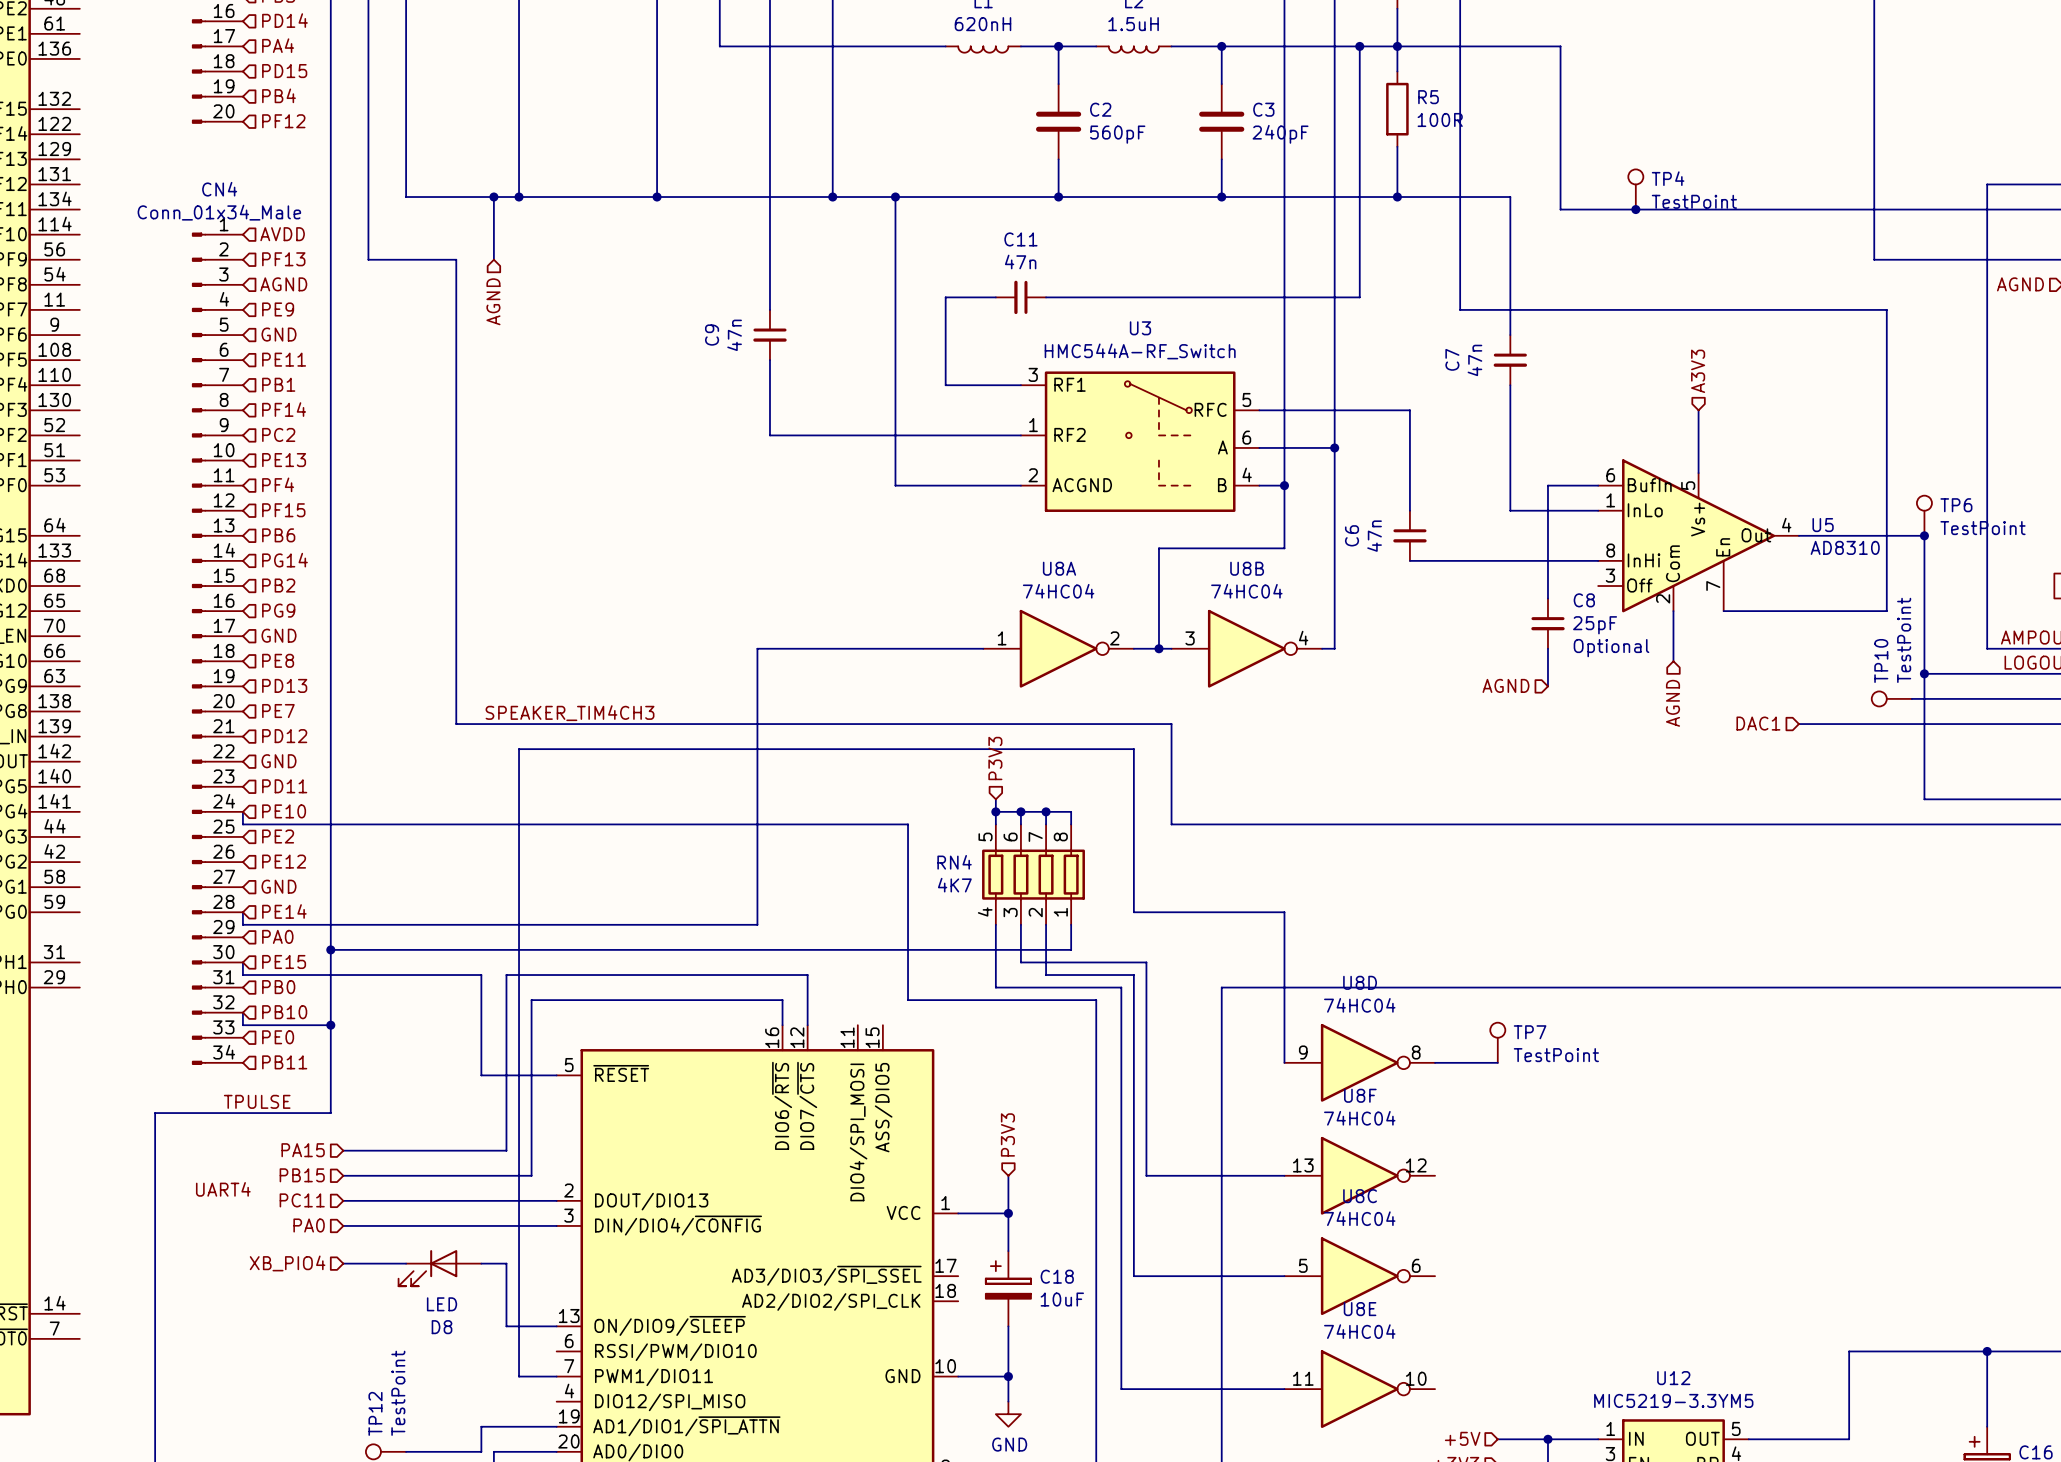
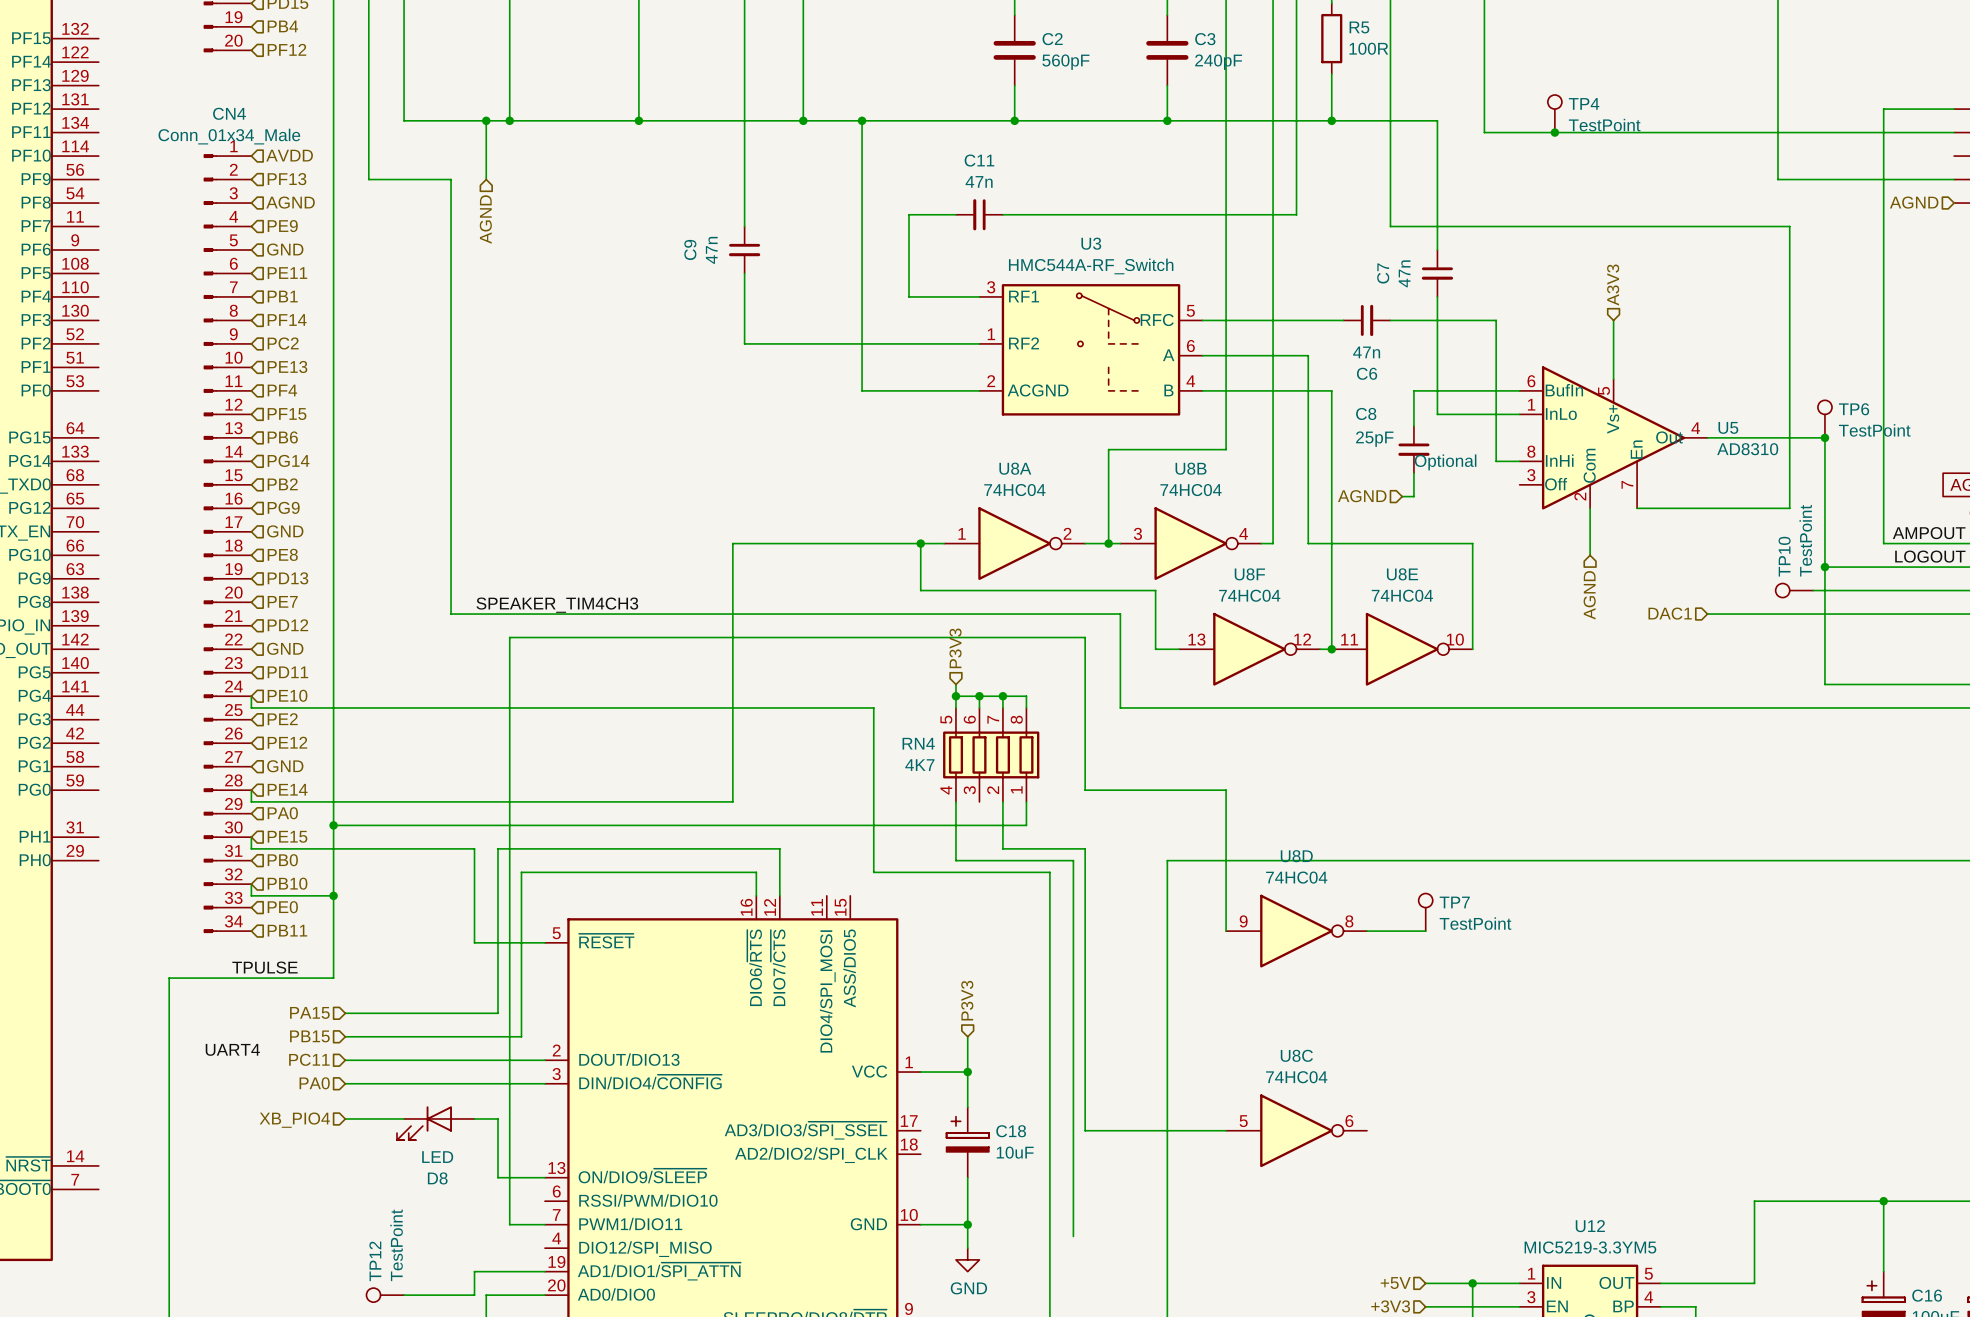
wire: (1409, 410) (1409, 510) -> none
wire: none -> (1273, 355) (1308, 355) (1308, 543) (1472, 543)
junction: (1334, 447) -> none
wire: none -> (1226, 390) (1331, 390) (1331, 649) (1320, 649)
junction: (1284, 485) -> none
wire: (1547, 485) (1547, 598) -> (1472, 390) (1413, 390) (1413, 426)
C6 rotation: 0° (1409, 535) -> 90° counterclockwise (1367, 320)
C6 position: (1409, 535) -> (1366, 320)
wire: (1409, 560) (1573, 560) -> (1390, 320) (1496, 320) (1496, 461)
wire: none -> (1413, 473) (1413, 496) (1402, 496)
C8 name position: C8 (1584, 600) -> C8 (1366, 413)
C8 position: (1547, 623) -> (1413, 449)
C8 value position: 25pF (1595, 625) -> 25pF (1374, 439)
wire: none -> (920, 543) (920, 590) (1155, 590) (1155, 649) (1179, 649)
junction: none -> (920, 543)
C8 text position: Optional (1611, 648) -> Optional (1445, 462)
hierarchical label position: AGND (1505, 685) -> AGND (1362, 496)
wire: none -> (1472, 578) (1472, 649)
junction: none -> (1331, 649)
wire: (1020, 924) (1020, 962) (1146, 962) (1146, 1175) (1284, 1175) -> none
U8F position: (1359, 1175) -> (1249, 649)
wire: (1121, 1389) (1284, 1389) -> none
U8E position: (1359, 1389) -> (1402, 649)

